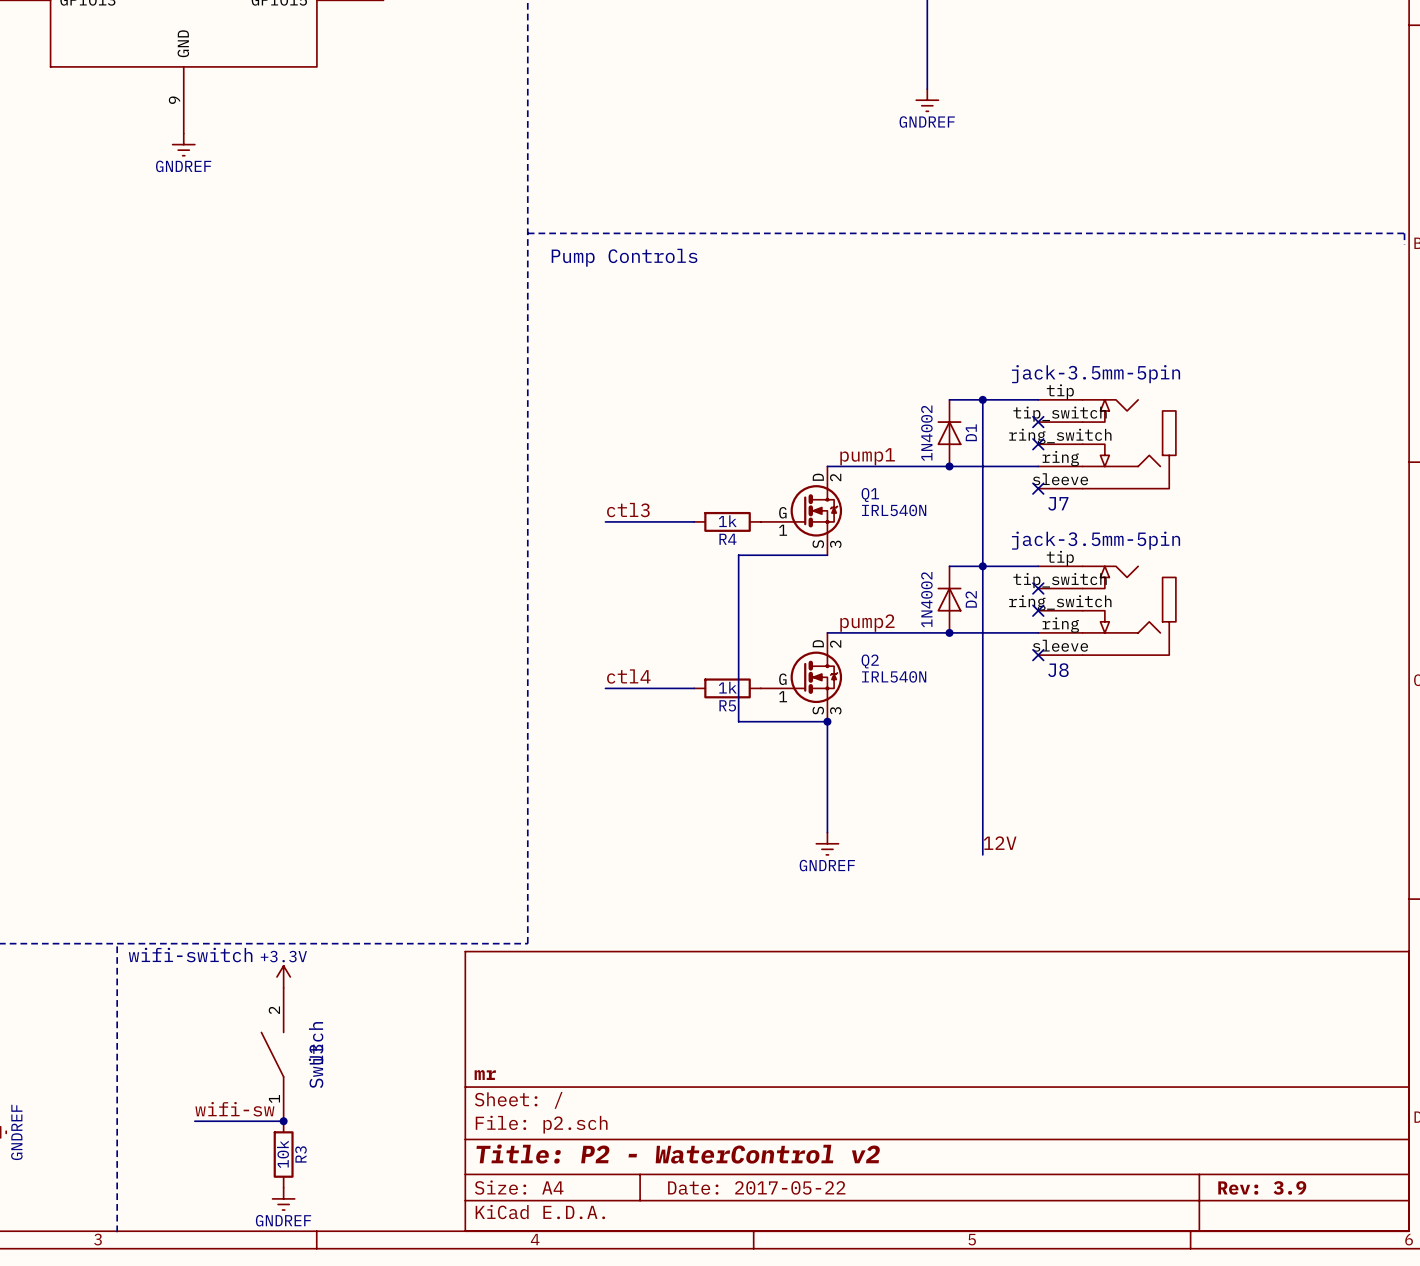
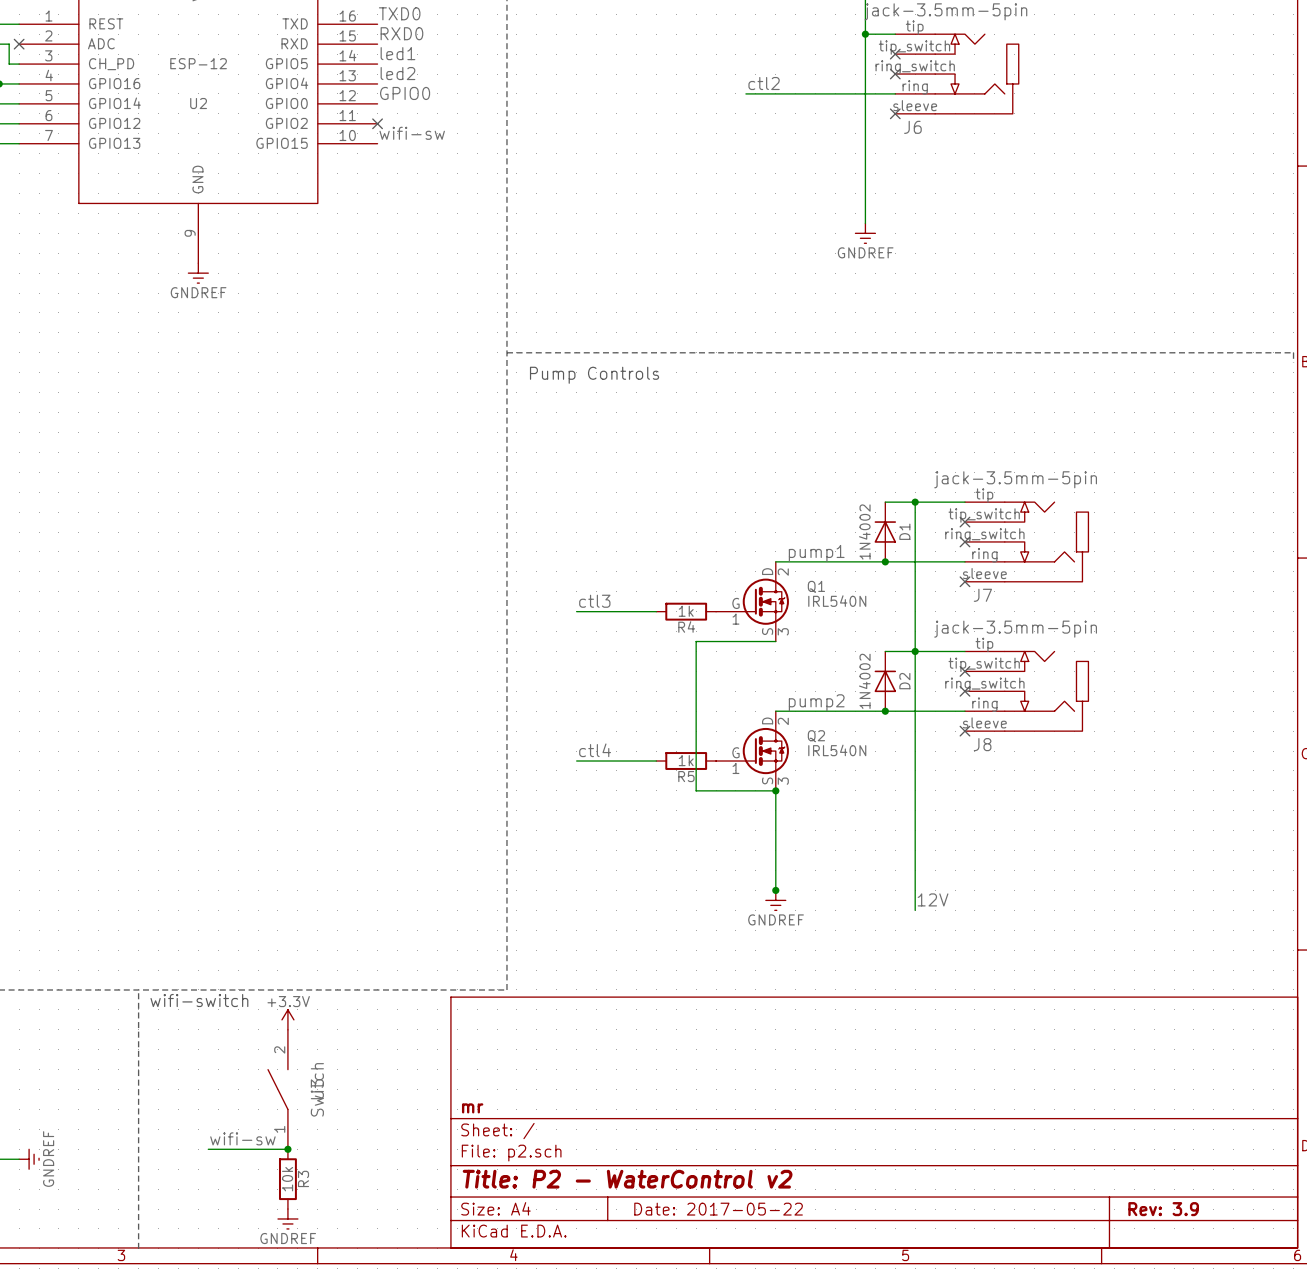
junction: none -> (775, 890)

